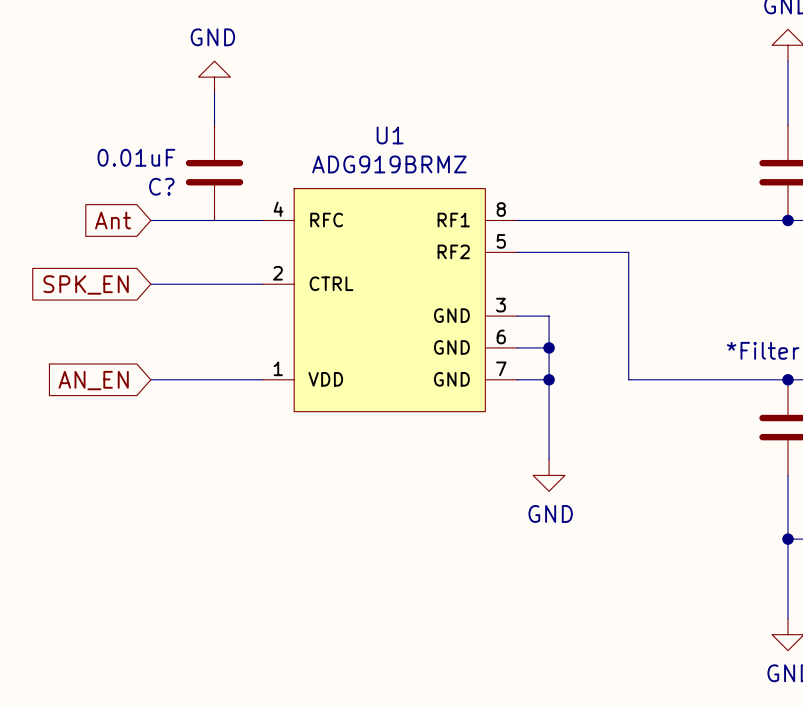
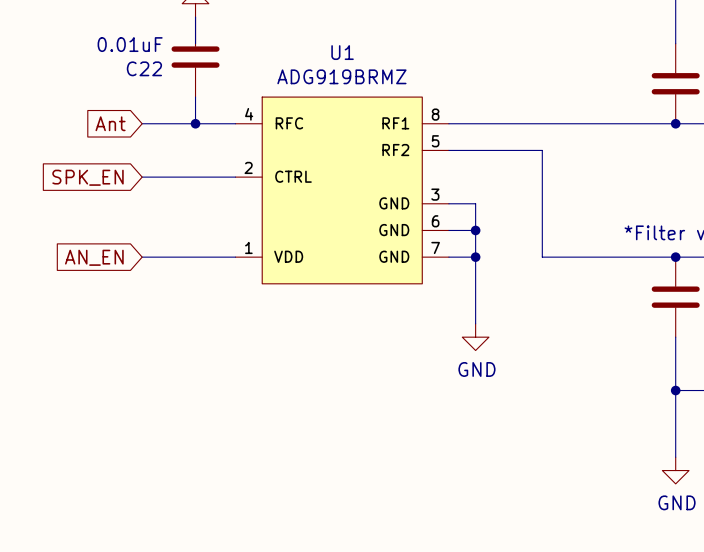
C22: none -> 0.01uF (195, 57)
C?: 0.01uF (214, 172) -> none
junction: none -> (195, 123)

